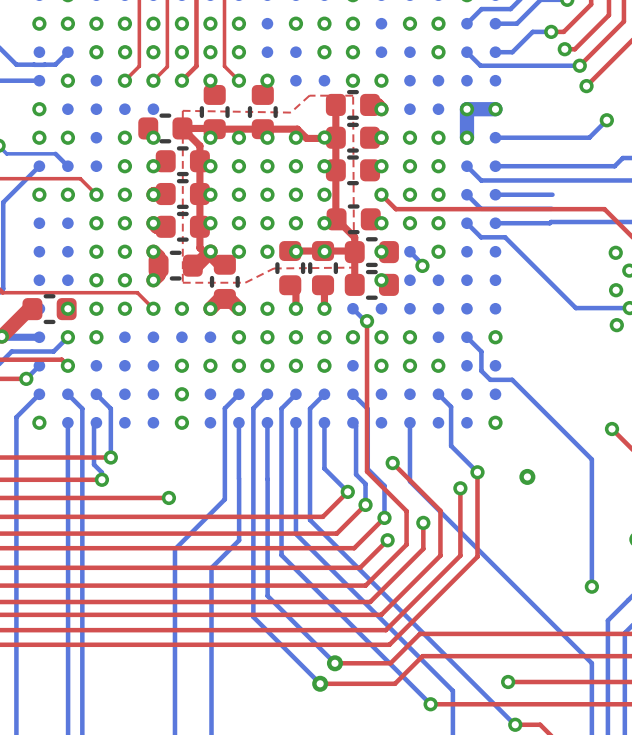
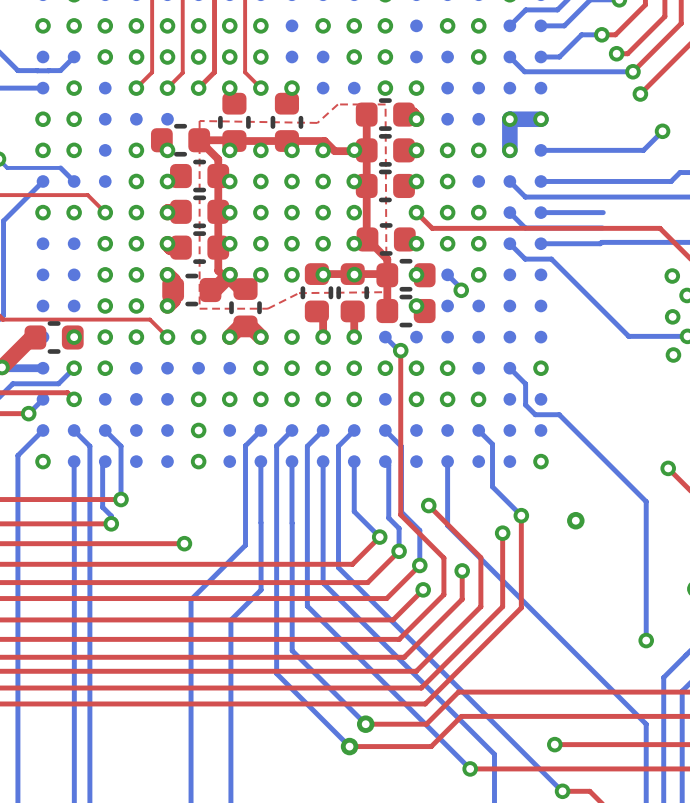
via: none -> (74, 119)
via: (438, 166) -> none

